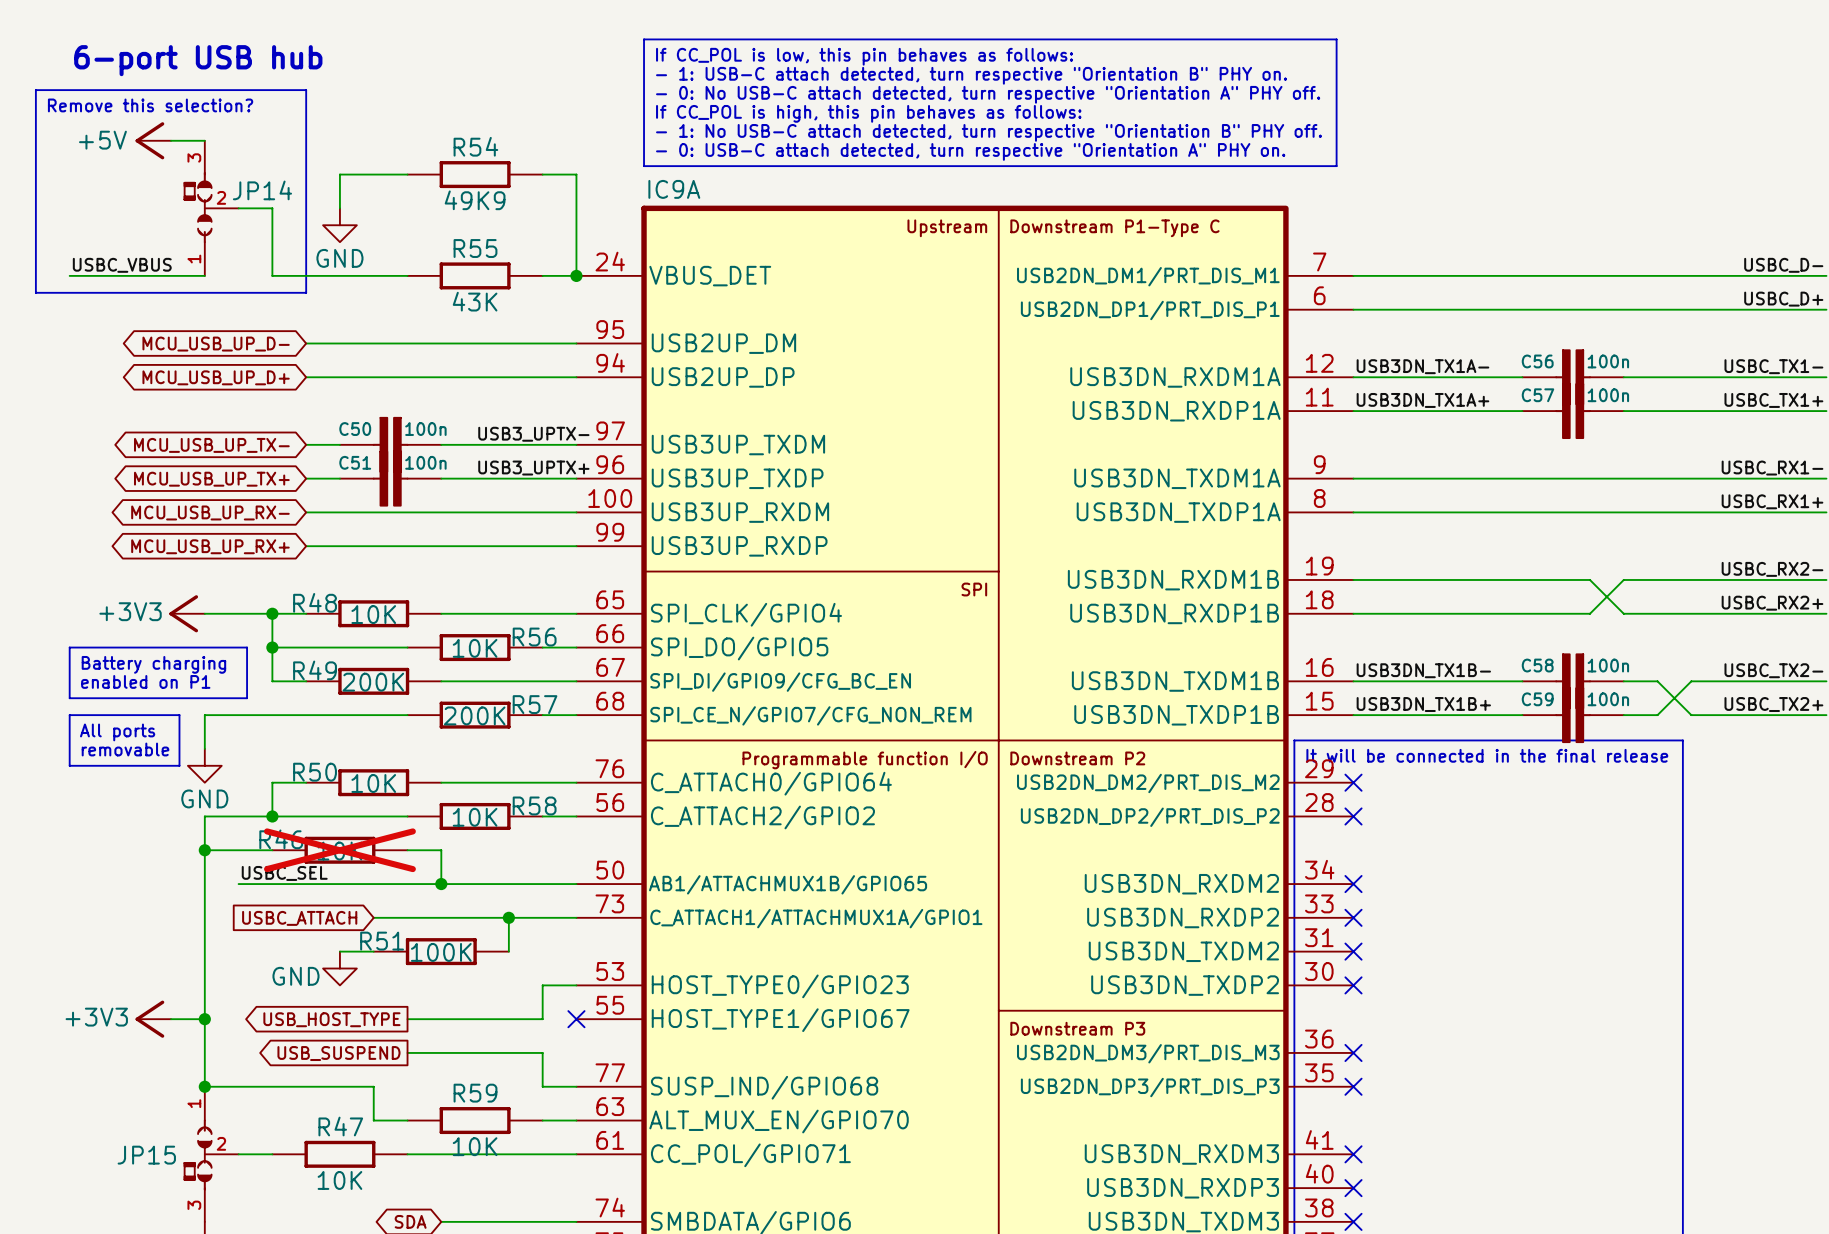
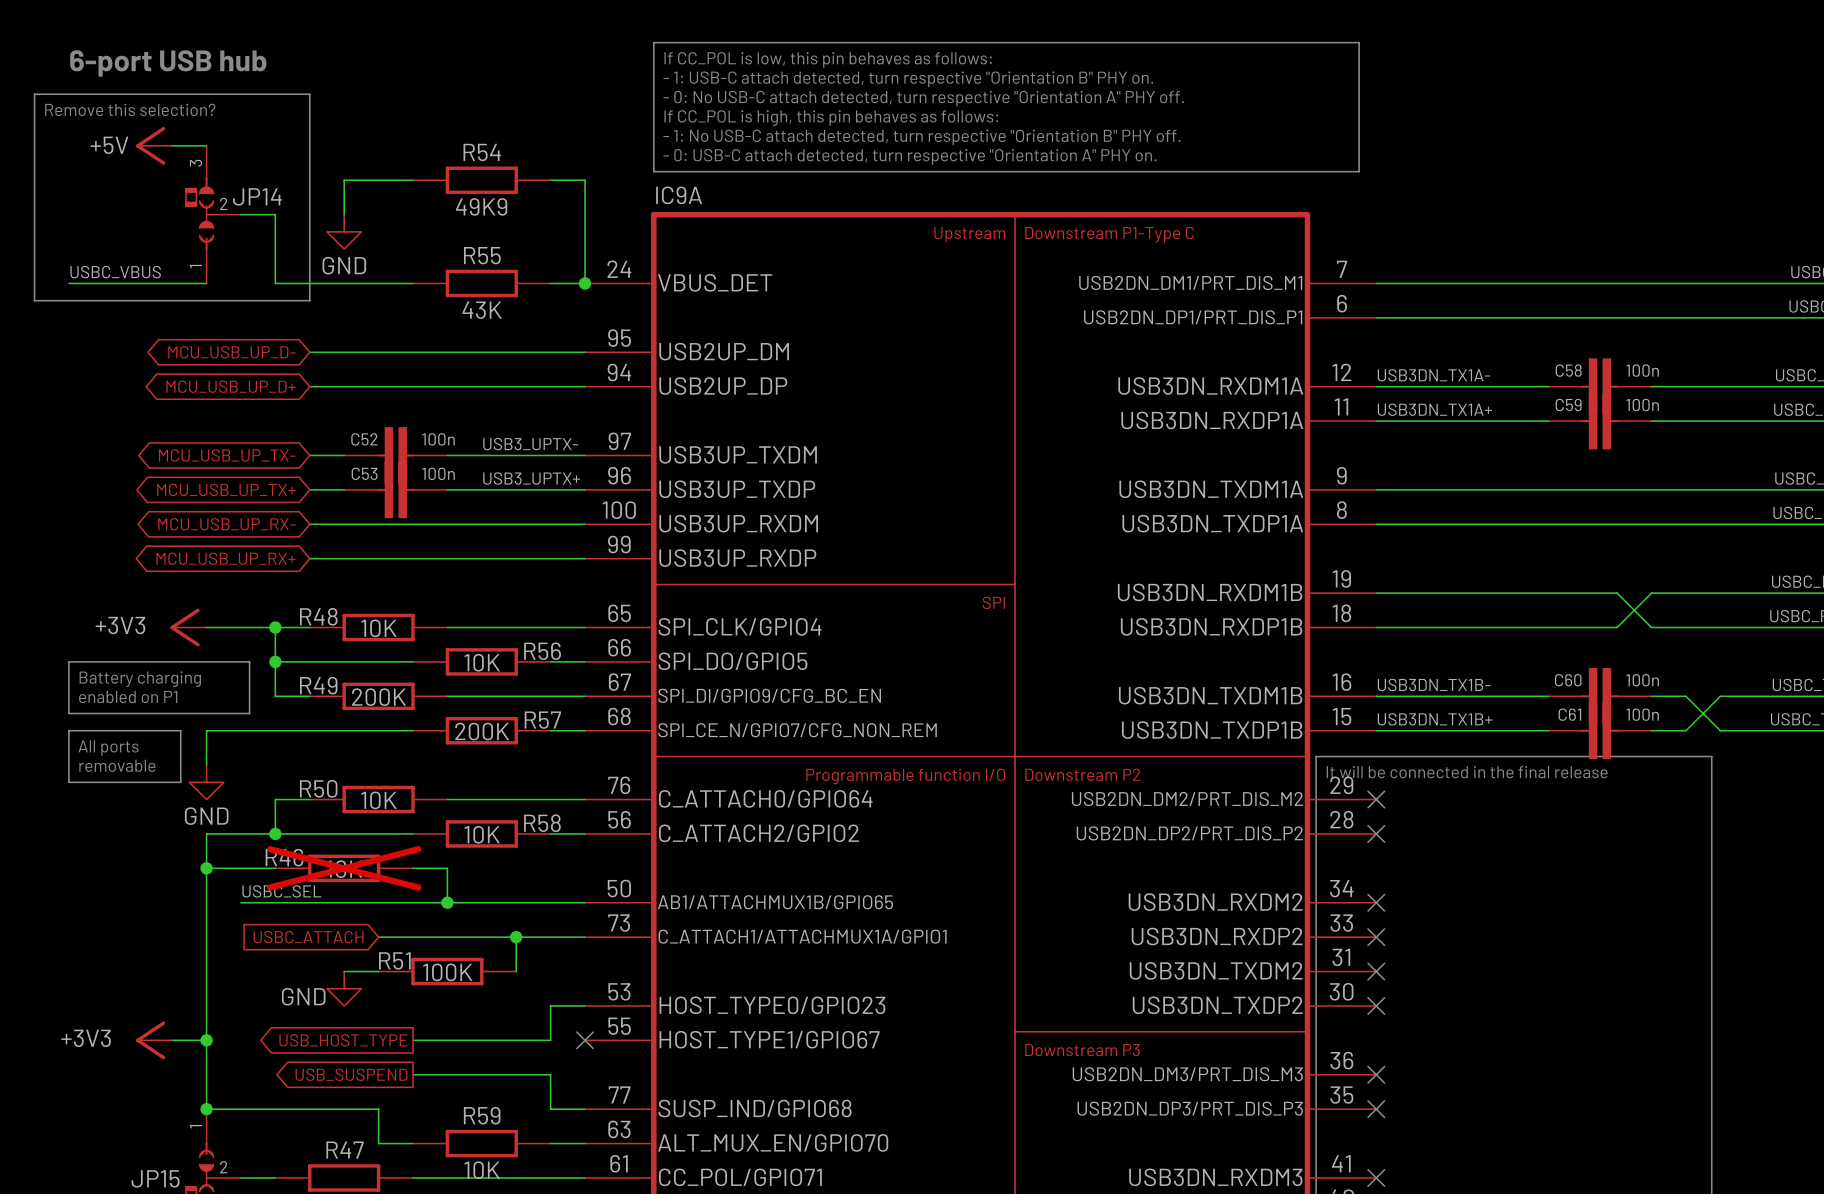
C56 name: C56 (1537, 361) -> C58 (1568, 370)
C57 name: C57 (1537, 395) -> C59 (1568, 405)
C50 name: C50 (355, 429) -> C52 (364, 439)
C51 name: C51 (355, 462) -> C53 (364, 473)
C58 name: C58 (1537, 665) -> C60 (1568, 680)
C59 name: C59 (1537, 699) -> C61 (1569, 714)

